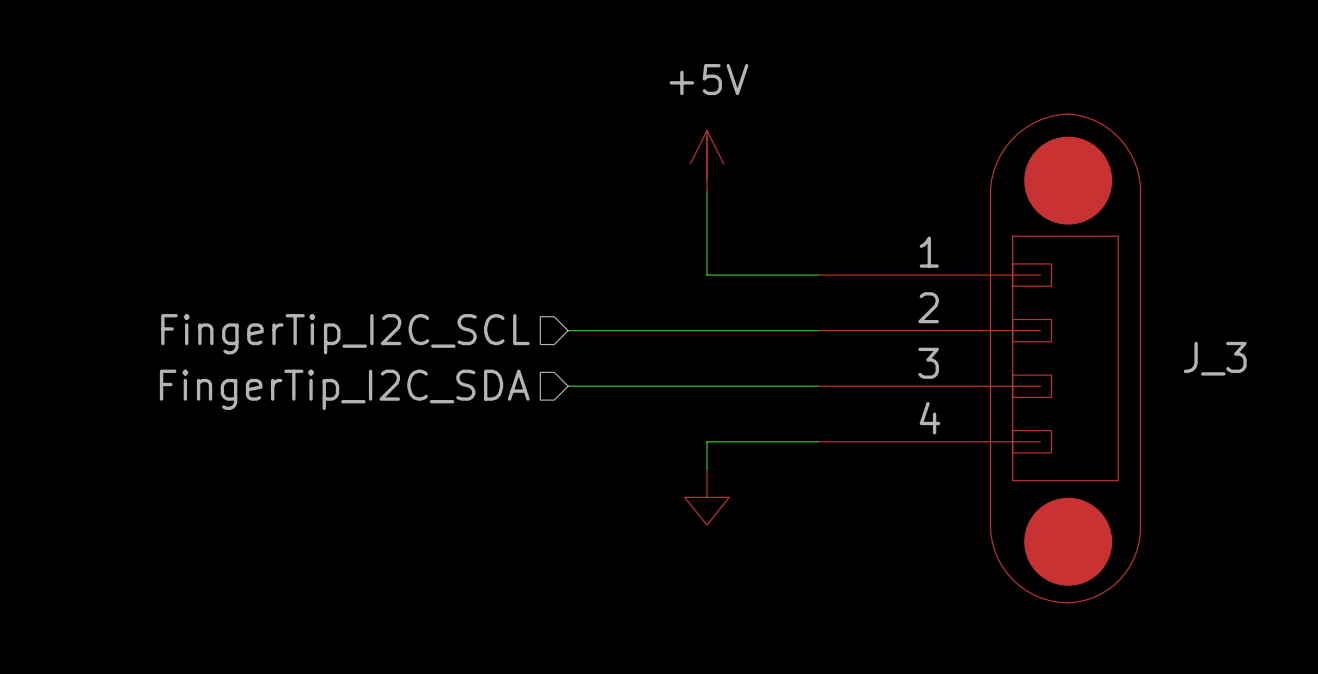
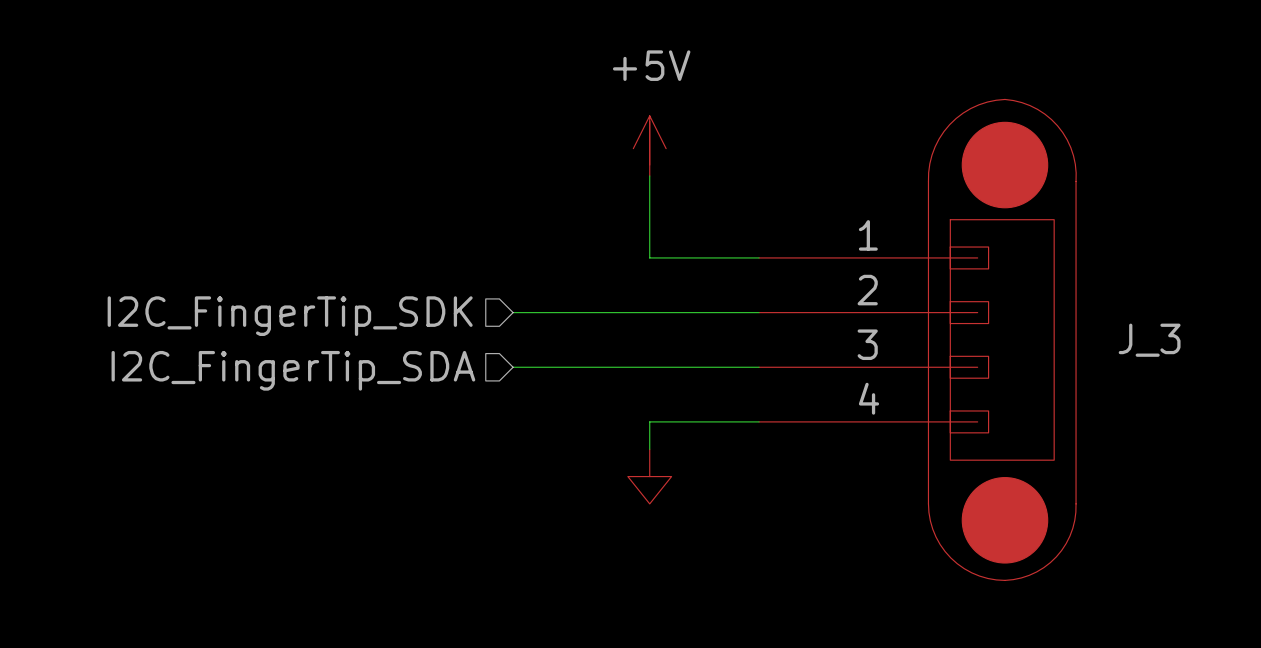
hierarchical label: FingerTip_I2C_SCL (345, 334) -> I2C_FingerTip_SDK (290, 316)
hierarchical label: FingerTip_I2C_SDA (344, 389) -> I2C_FingerTip_SDA (293, 370)

